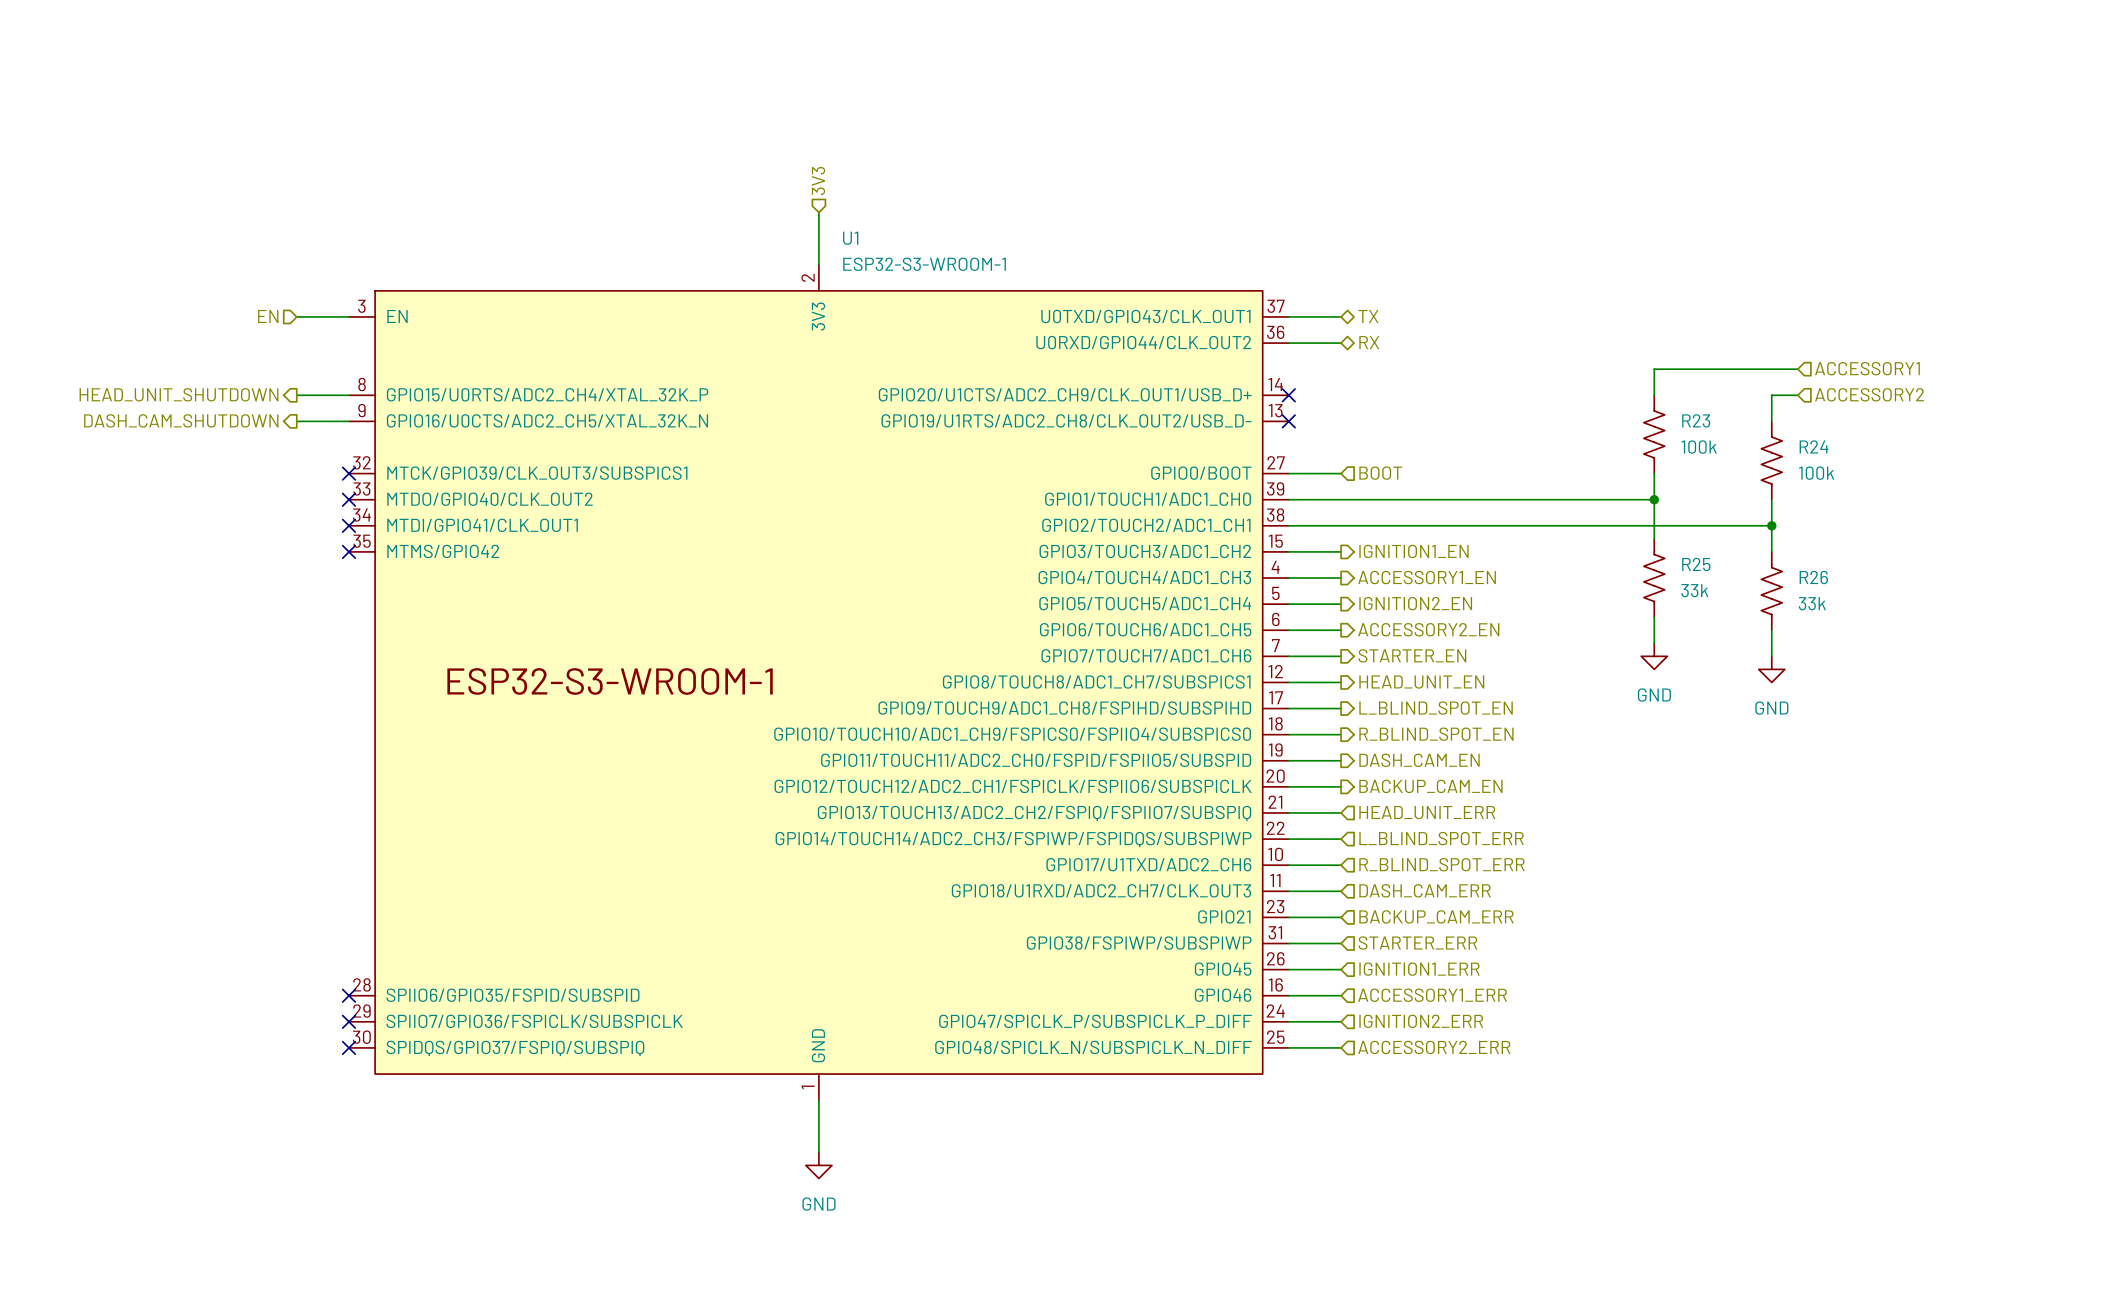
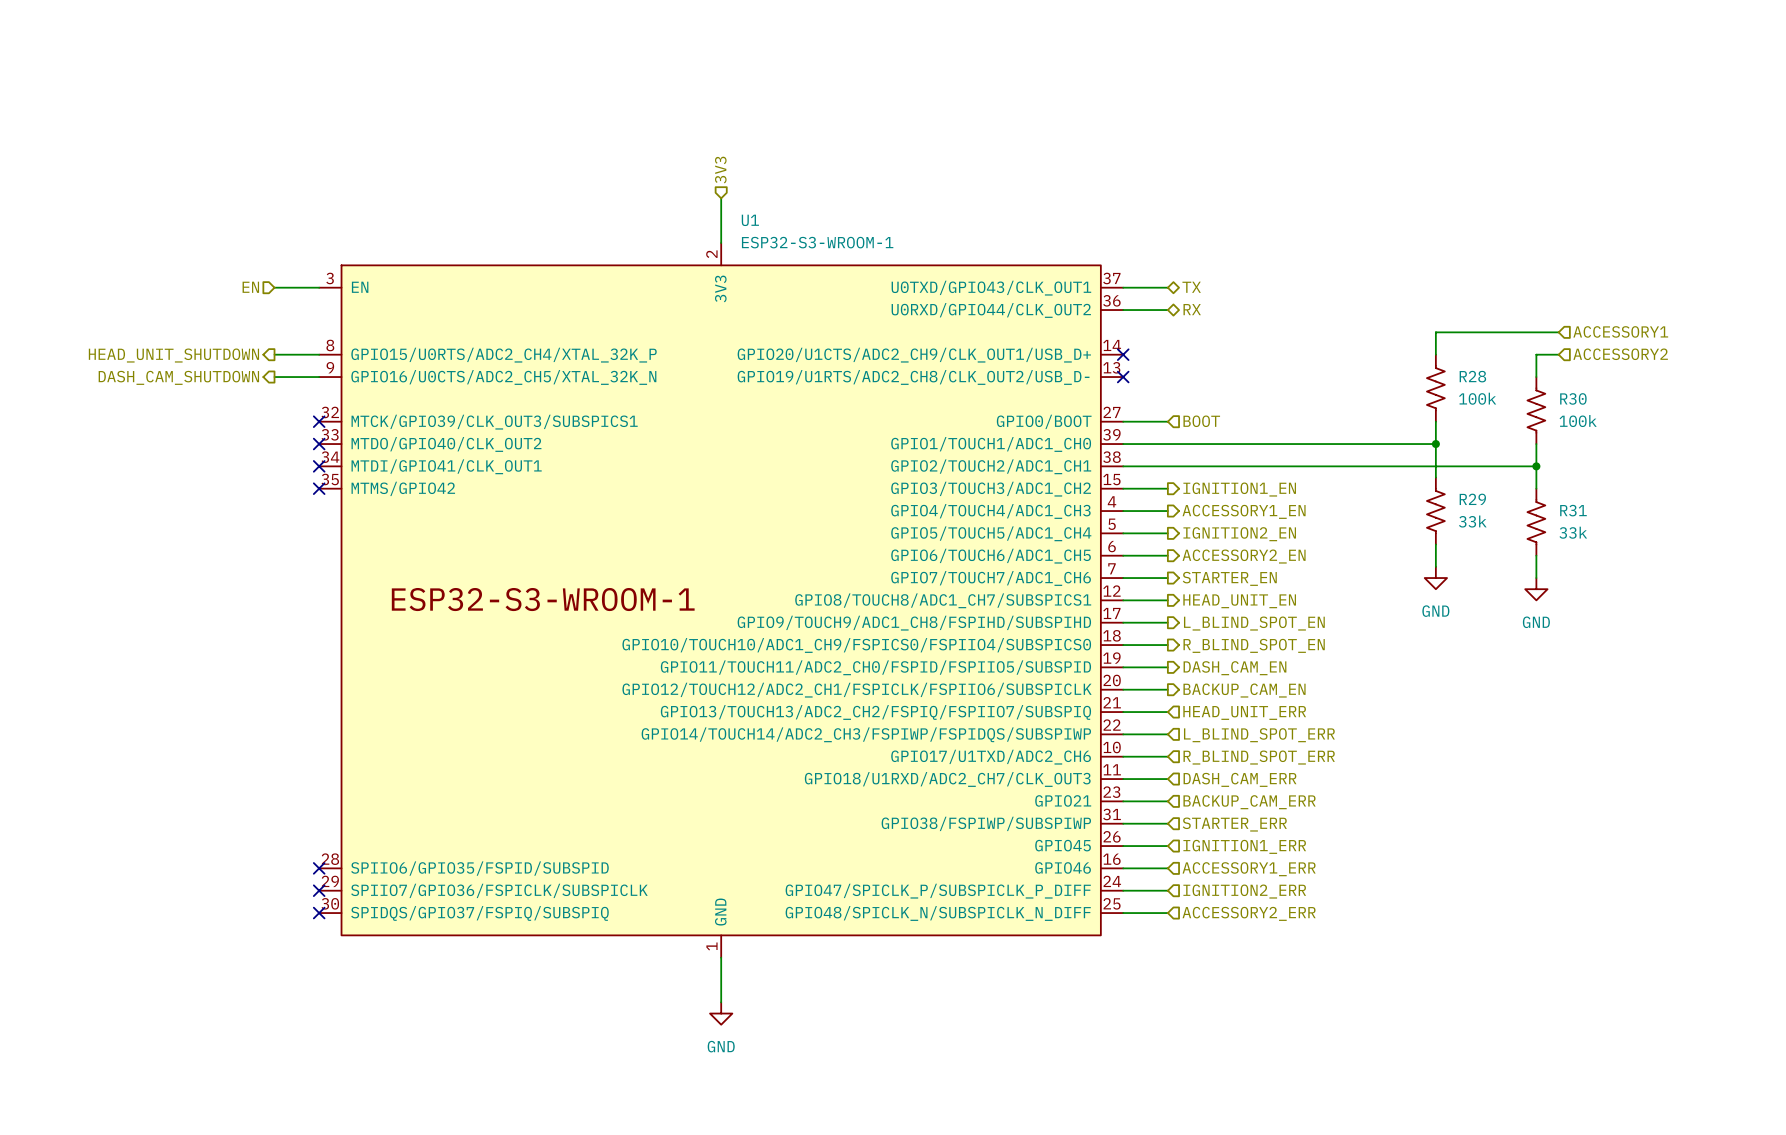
R23 name: R23 (1696, 420) -> R28 (1472, 376)
R24 name: R24 (1814, 446) -> R30 (1573, 398)
R25 name: R25 (1696, 564) -> R29 (1472, 499)
R26 name: R26 (1813, 577) -> R31 (1573, 510)

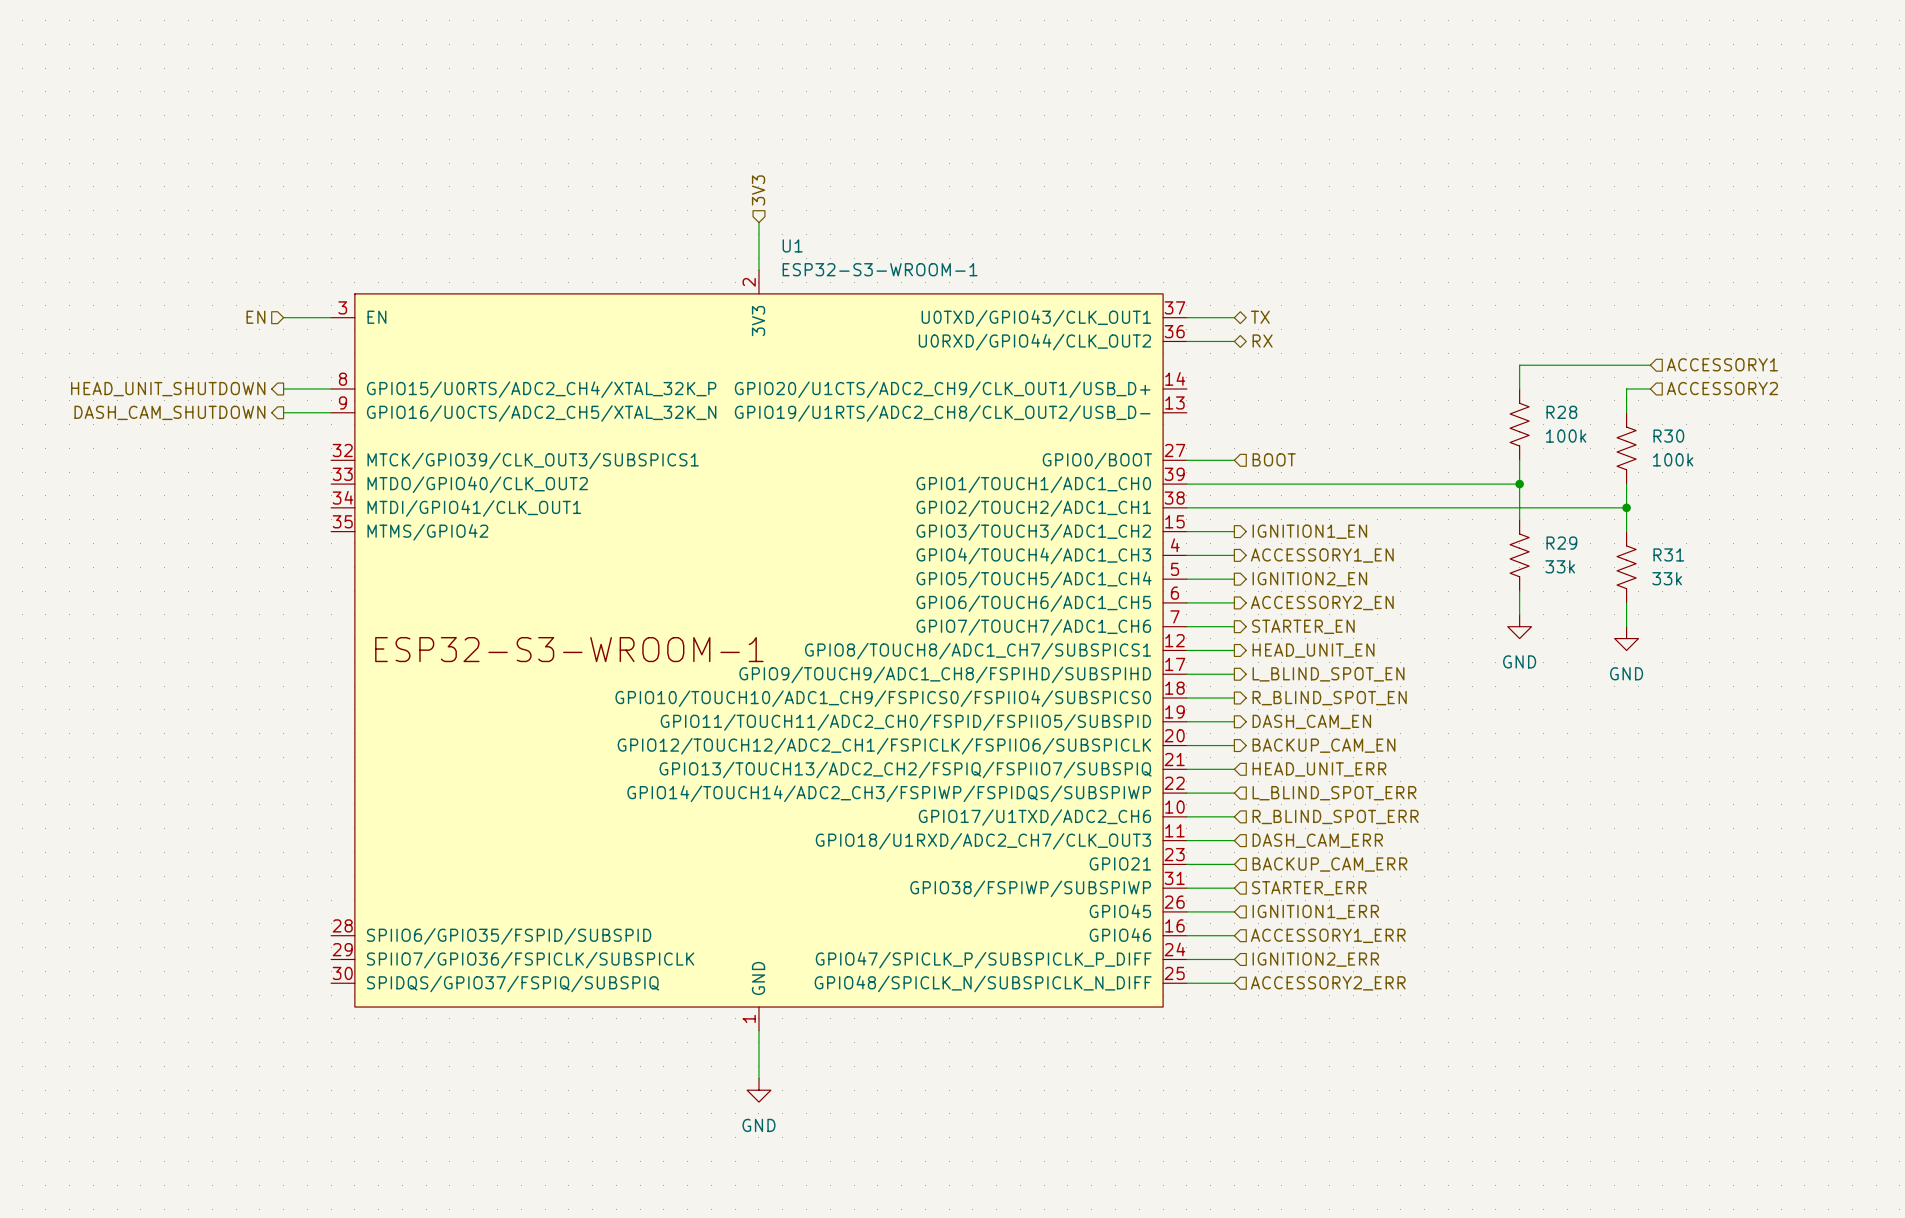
no-connect mark: (1123, 354) -> none
no-connect mark: (1123, 377) -> none
no-connect mark: (319, 421) -> none
no-connect mark: (319, 444) -> none
no-connect mark: (319, 466) -> none
no-connect mark: (319, 488) -> none
no-connect mark: (319, 868) -> none
no-connect mark: (319, 890) -> none
no-connect mark: (319, 913) -> none

